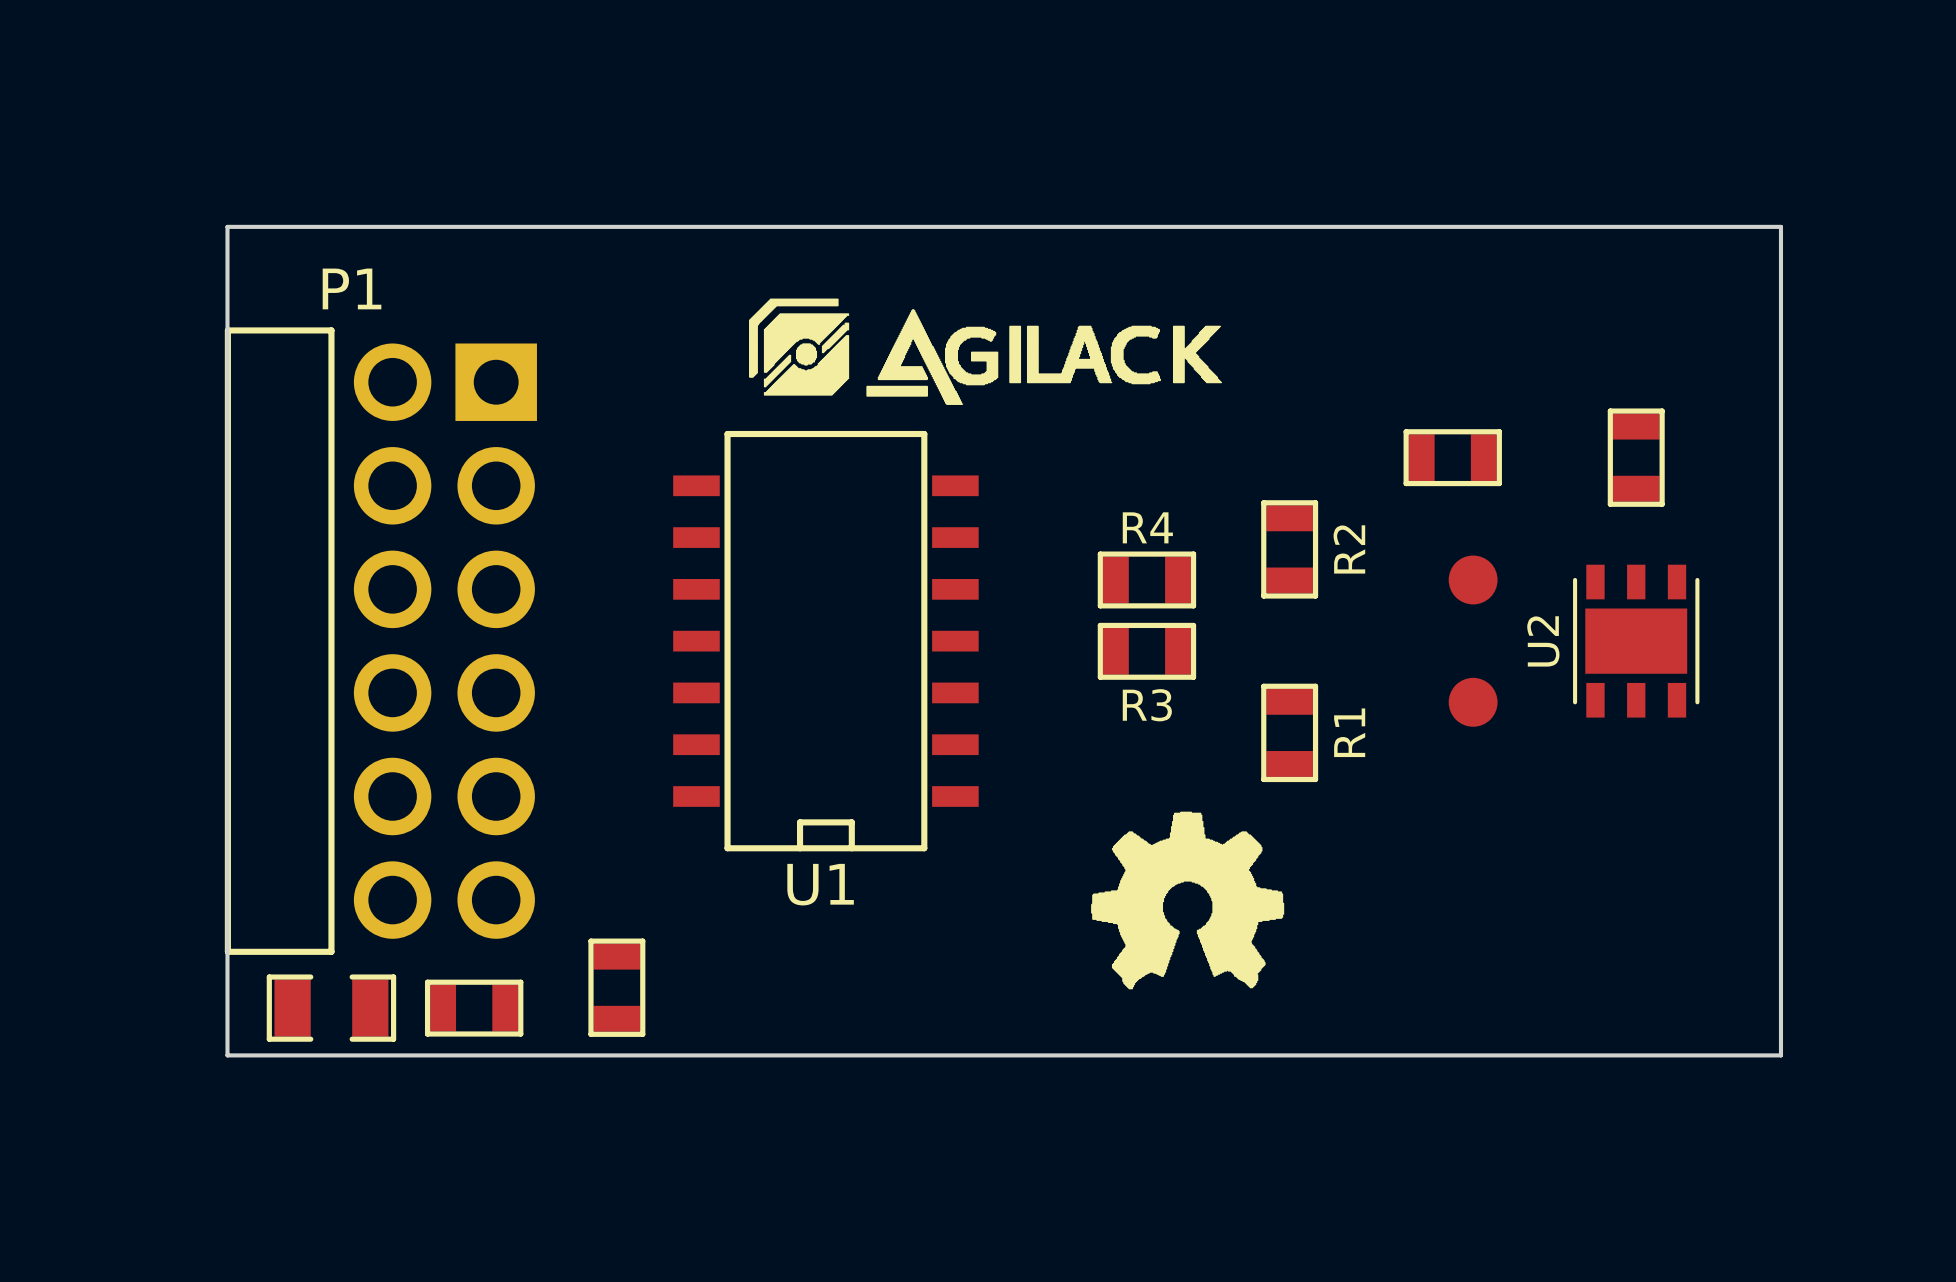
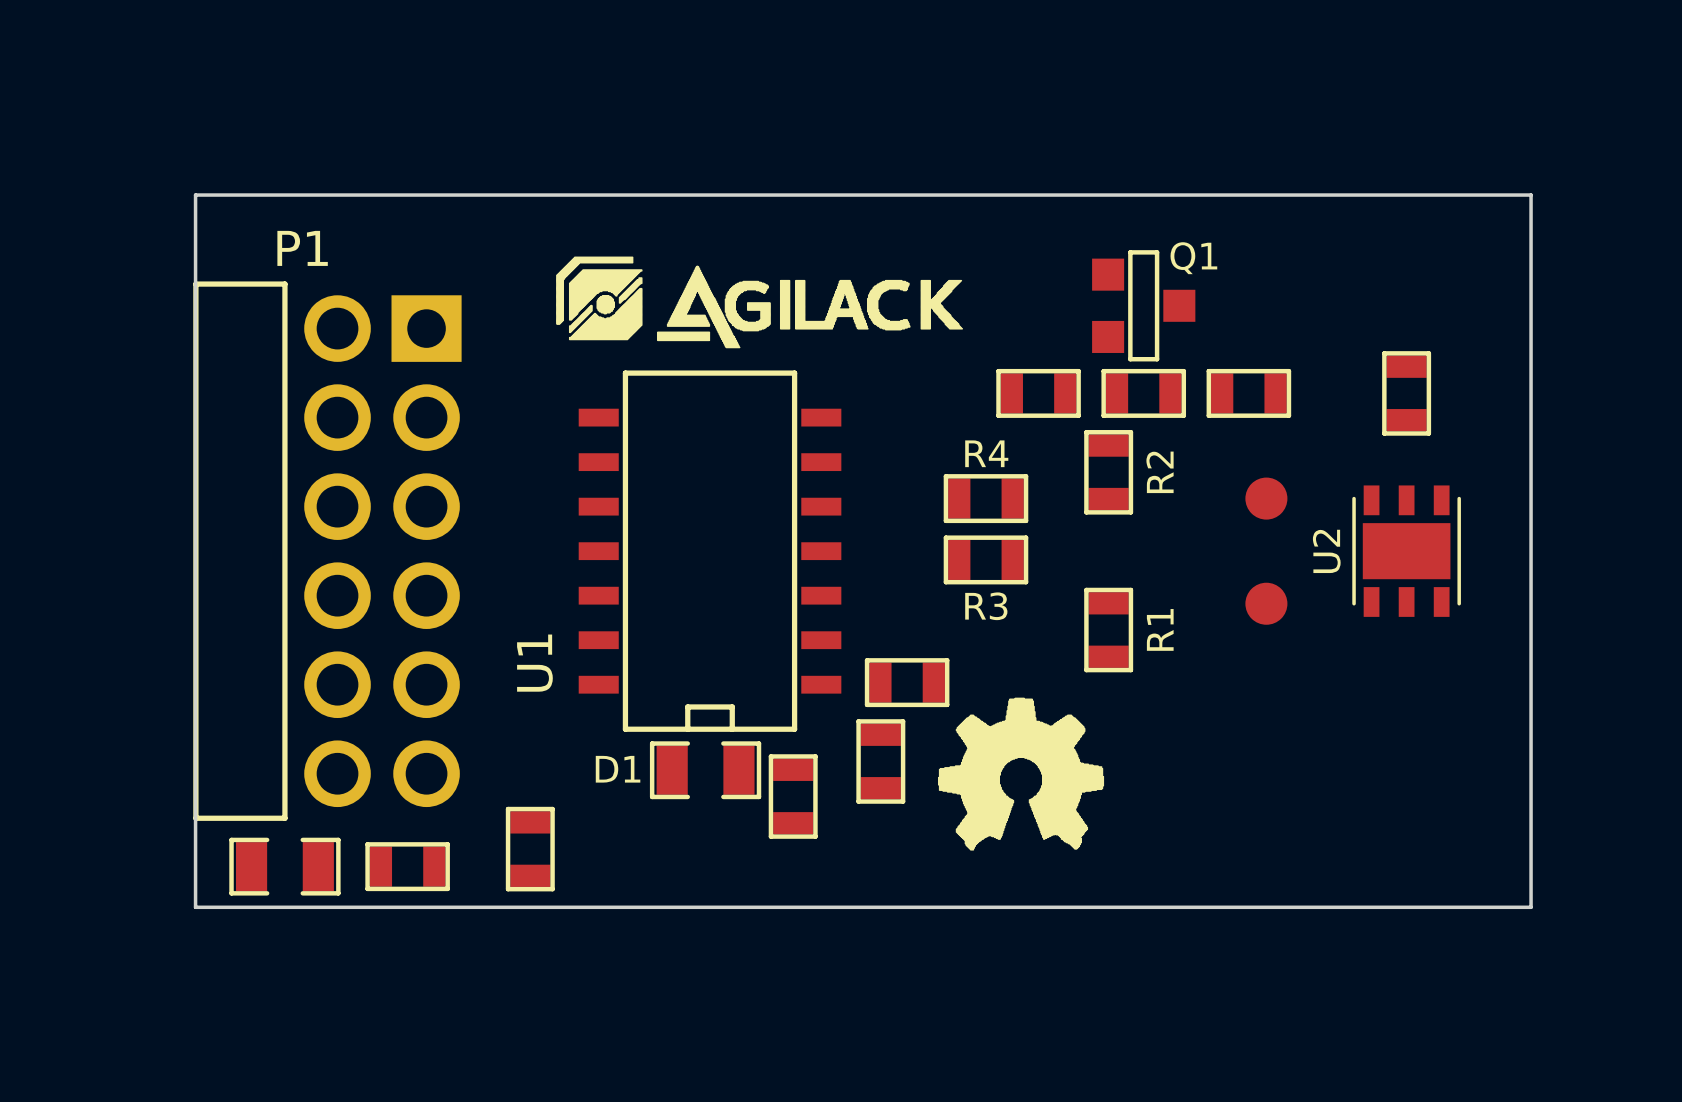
drawing position: (985, 351) -> (759, 302)
Q1: none -> (1143, 305)
part: none -> (1038, 393)
part: none -> (1143, 393)
part: none -> (907, 682)
U1 name rotation: 0° (820, 884) -> 90° counterclockwise (534, 663)
U1 name position: U1 (820, 884) -> U1 (534, 663)
part: none -> (880, 761)
D1: none -> (705, 770)
part: none -> (793, 796)

